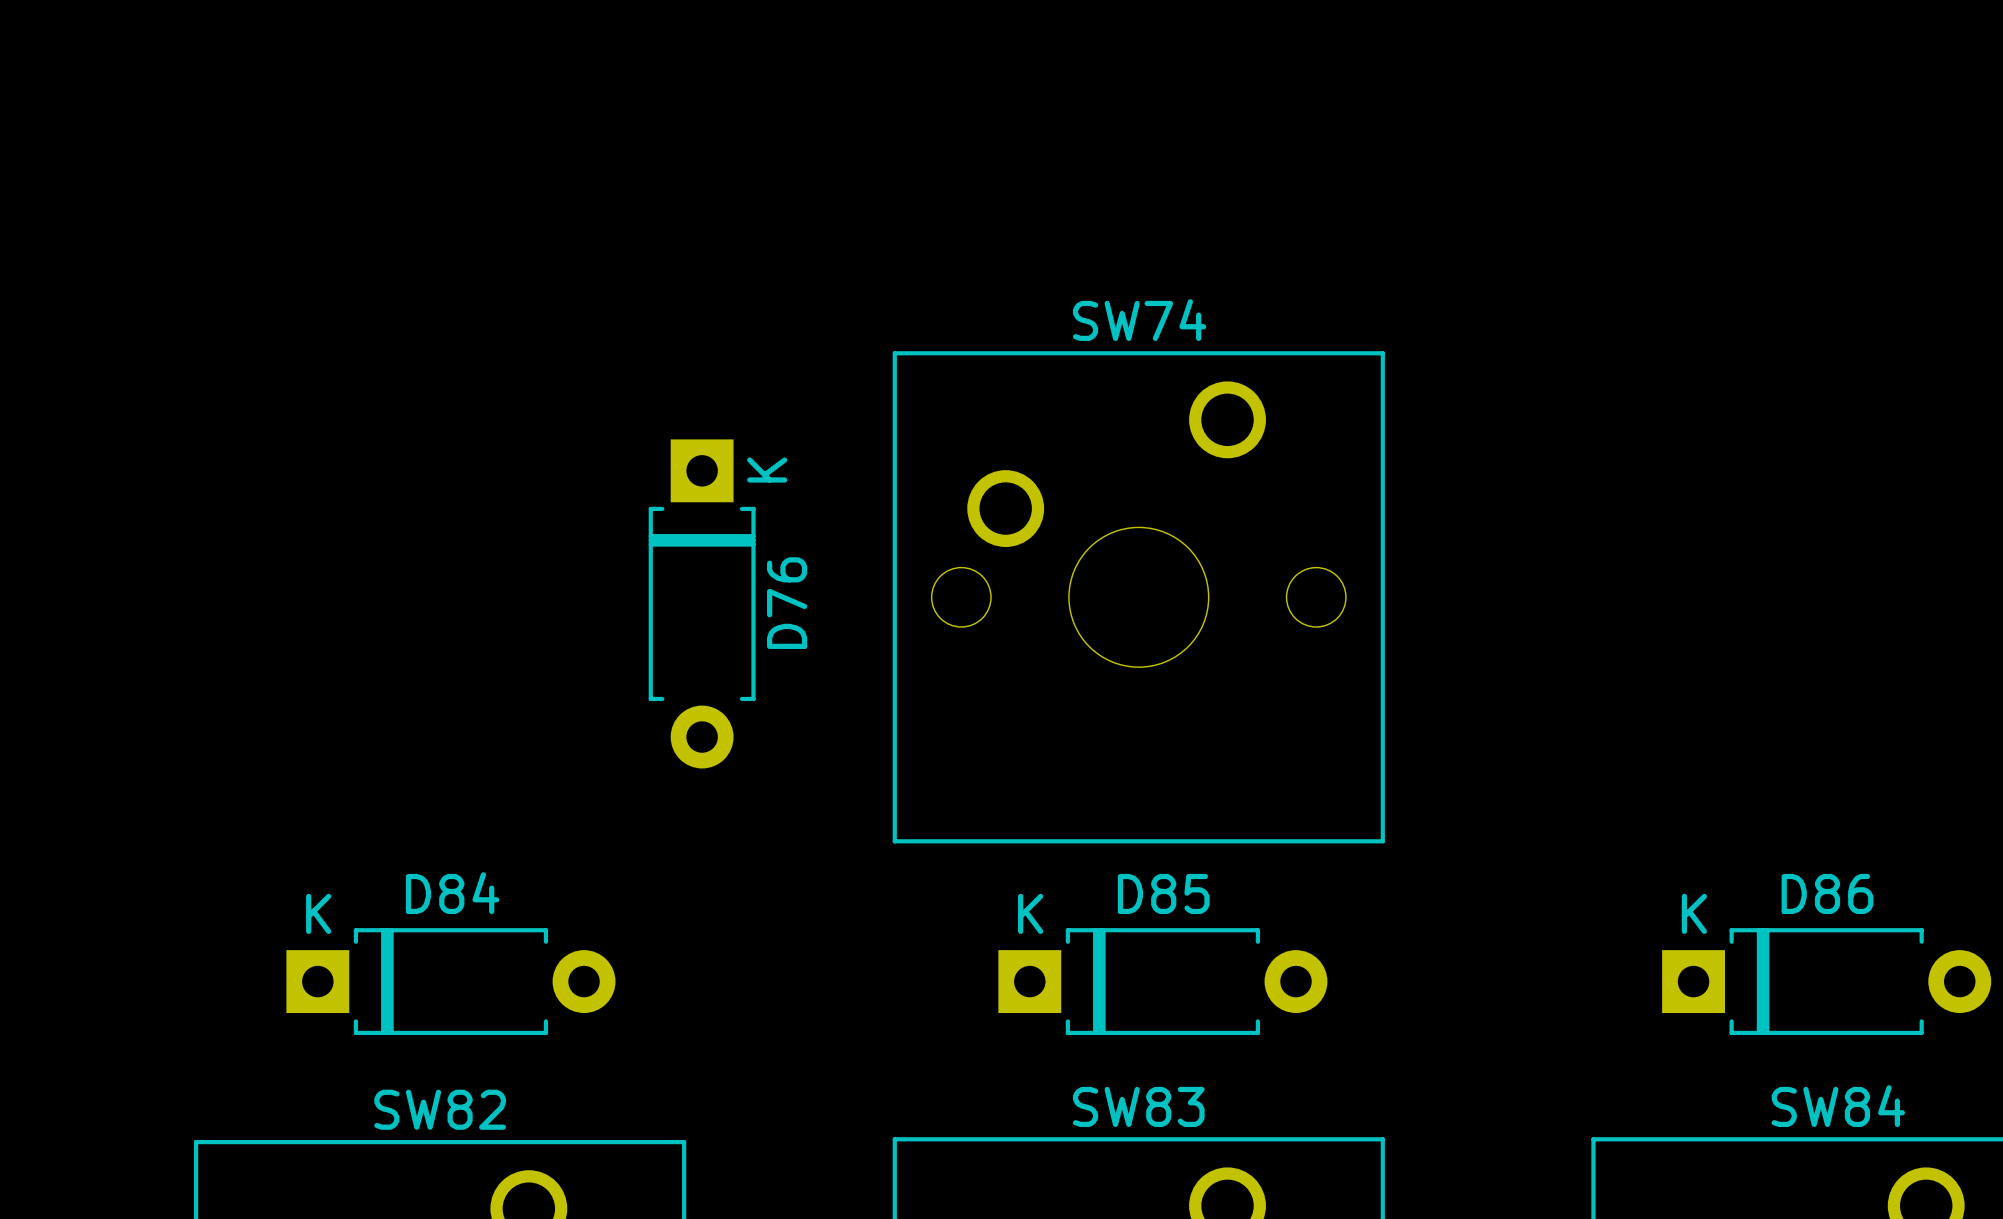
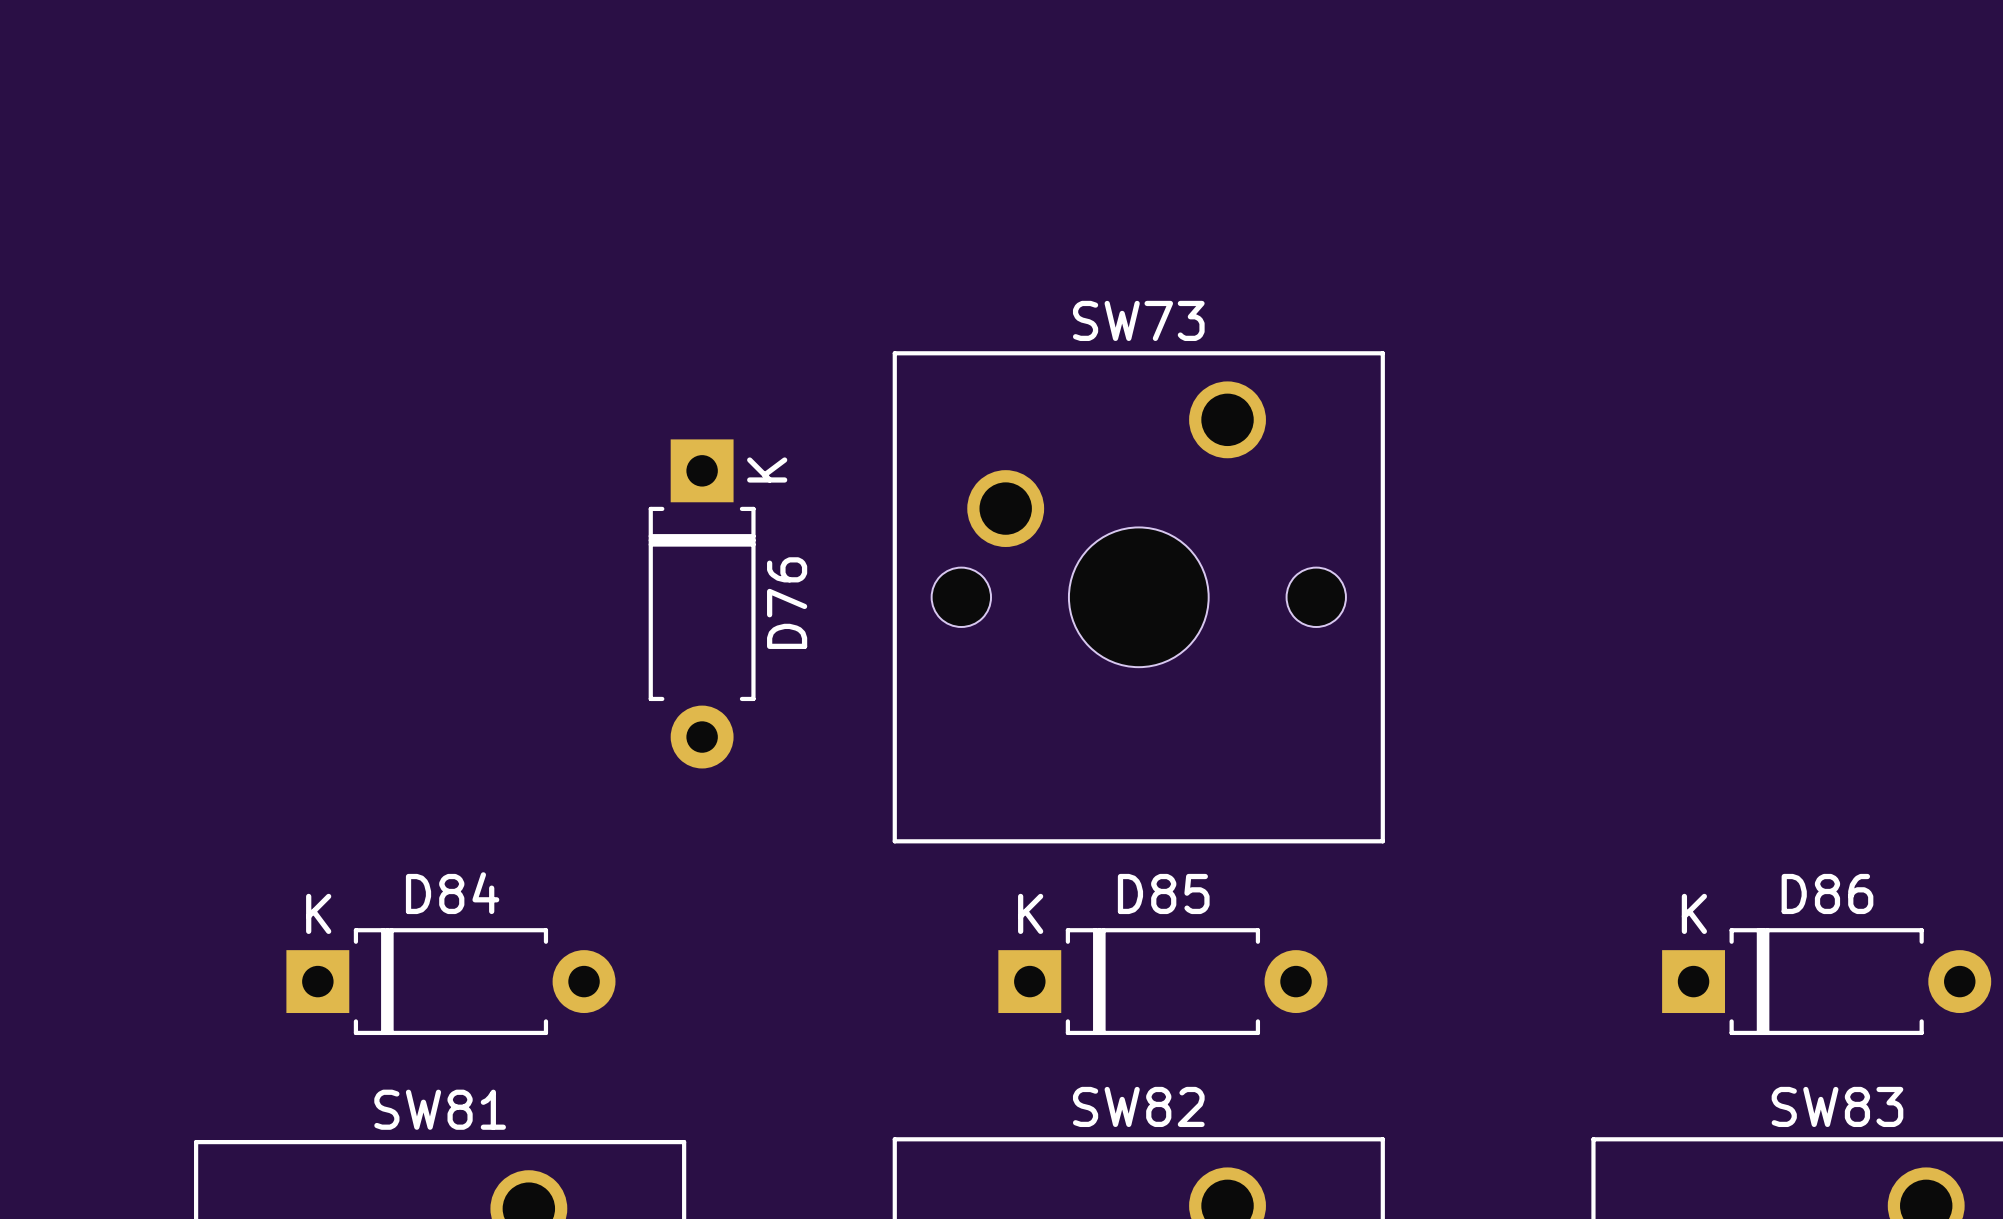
SW74 name: SW74 (1139, 320) -> SW73 (1138, 320)
SW83 name: SW83 (1138, 1106) -> SW82 (1138, 1106)
SW84 name: SW84 (1838, 1106) -> SW83 (1837, 1106)
SW82 name: SW82 (440, 1109) -> SW81 (440, 1109)

